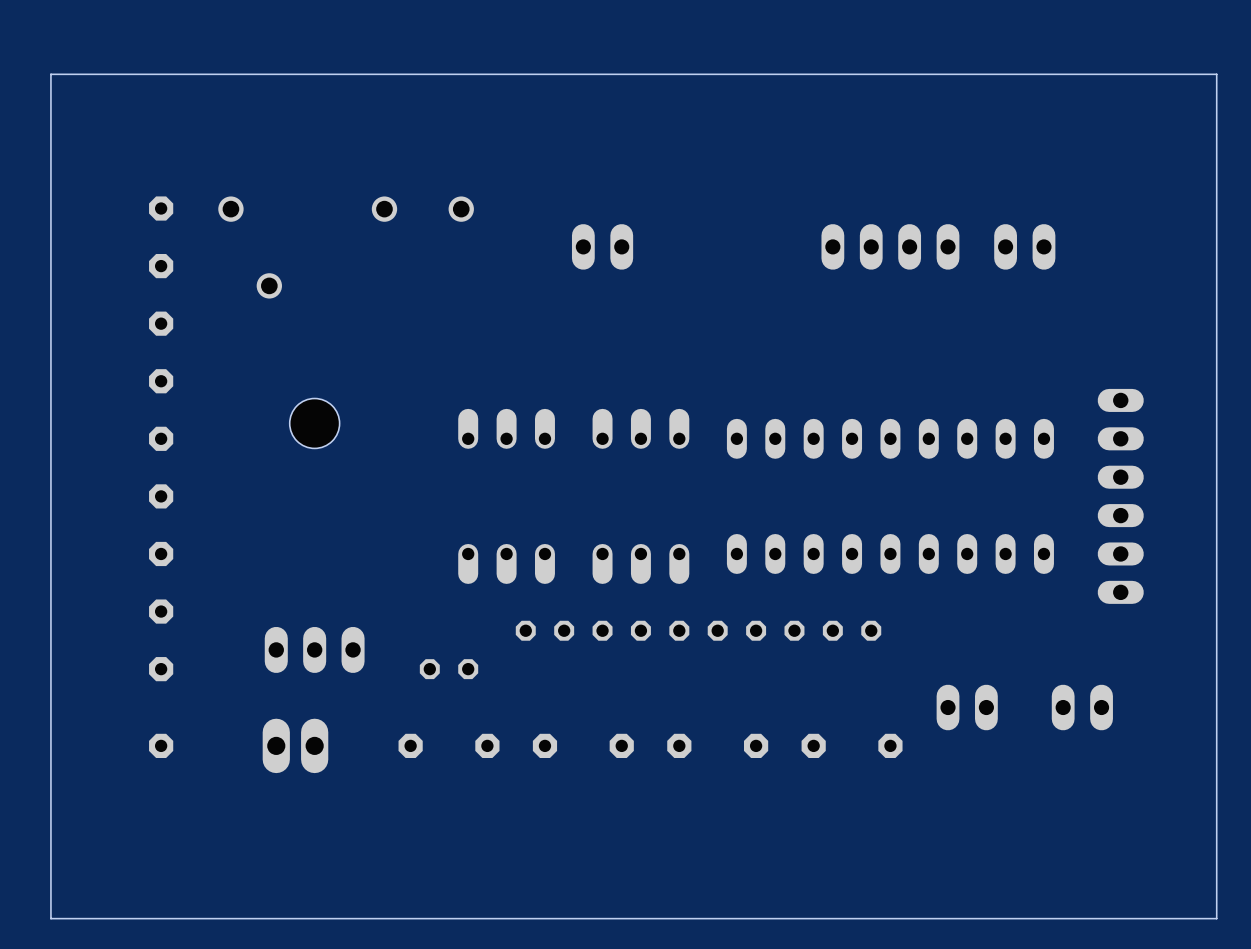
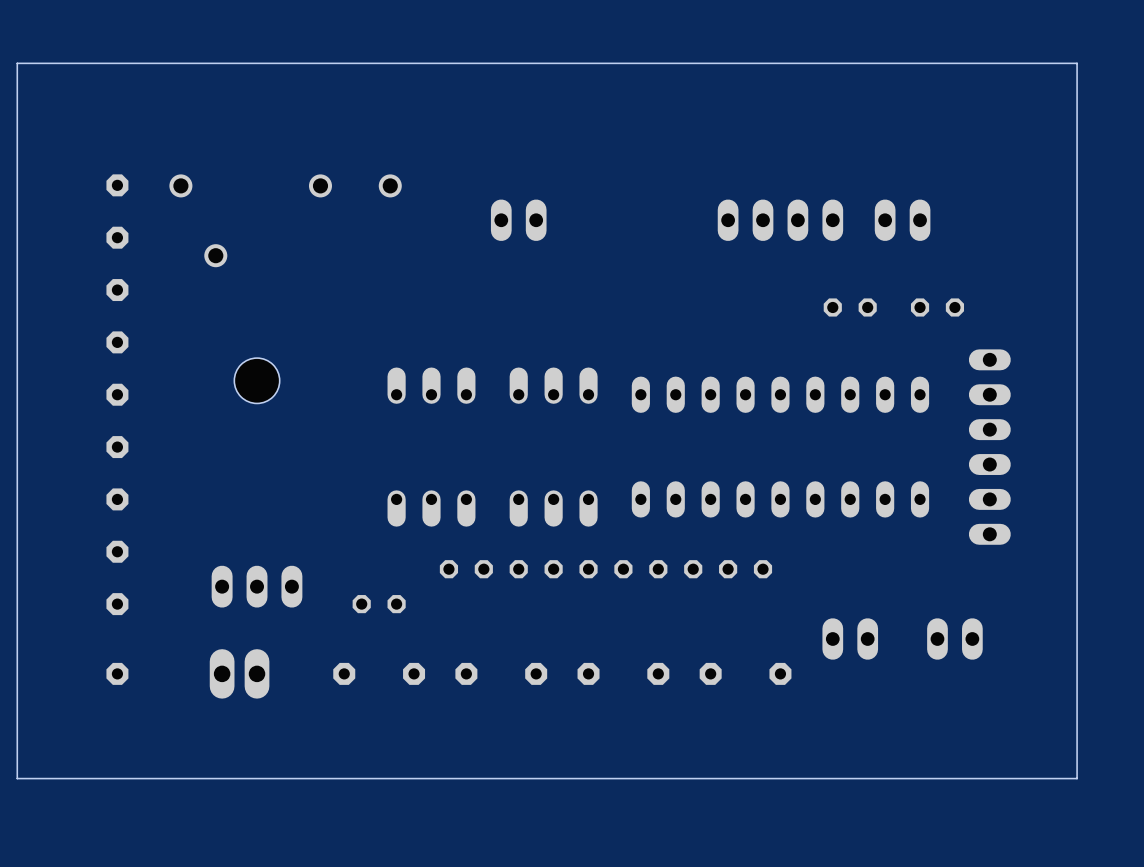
part: none -> (850, 307)
part: none -> (937, 307)
board edge: (1216, 861) (1216, 918) (50, 918) (50, 861) -> (1077, 778) (17, 778)

